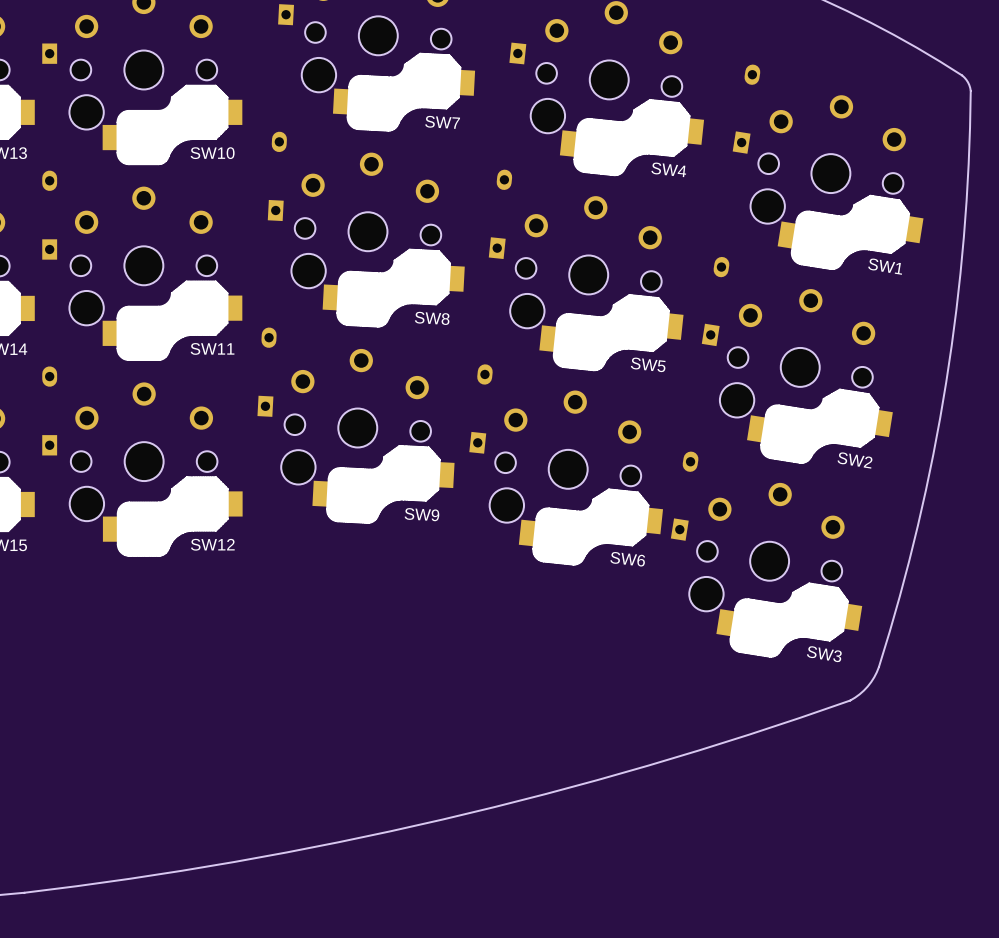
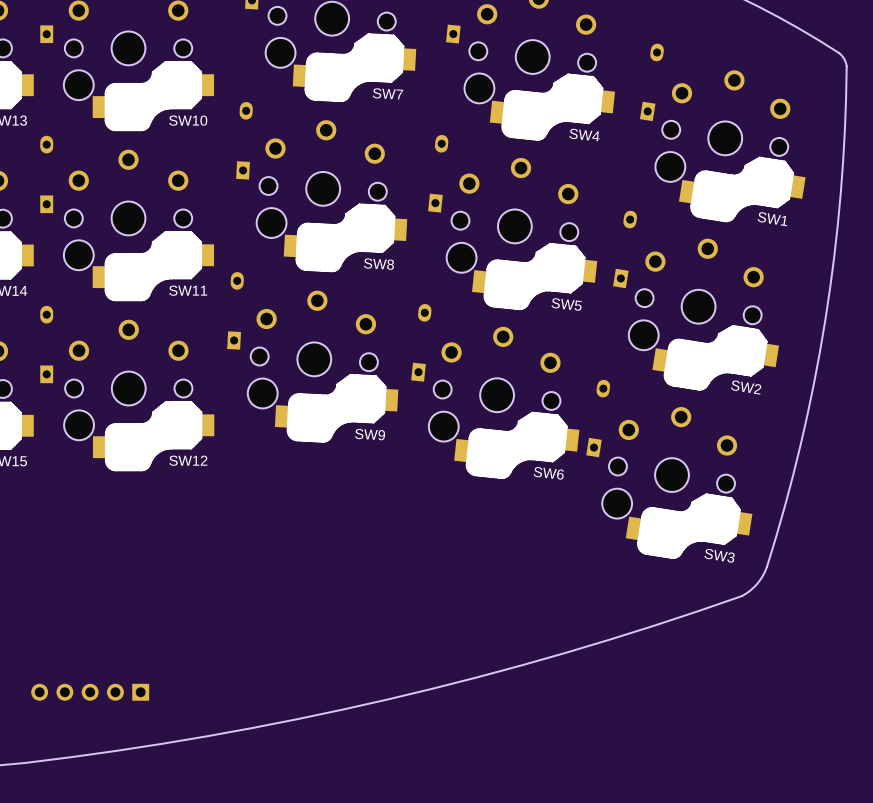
part: none -> (90, 692)

